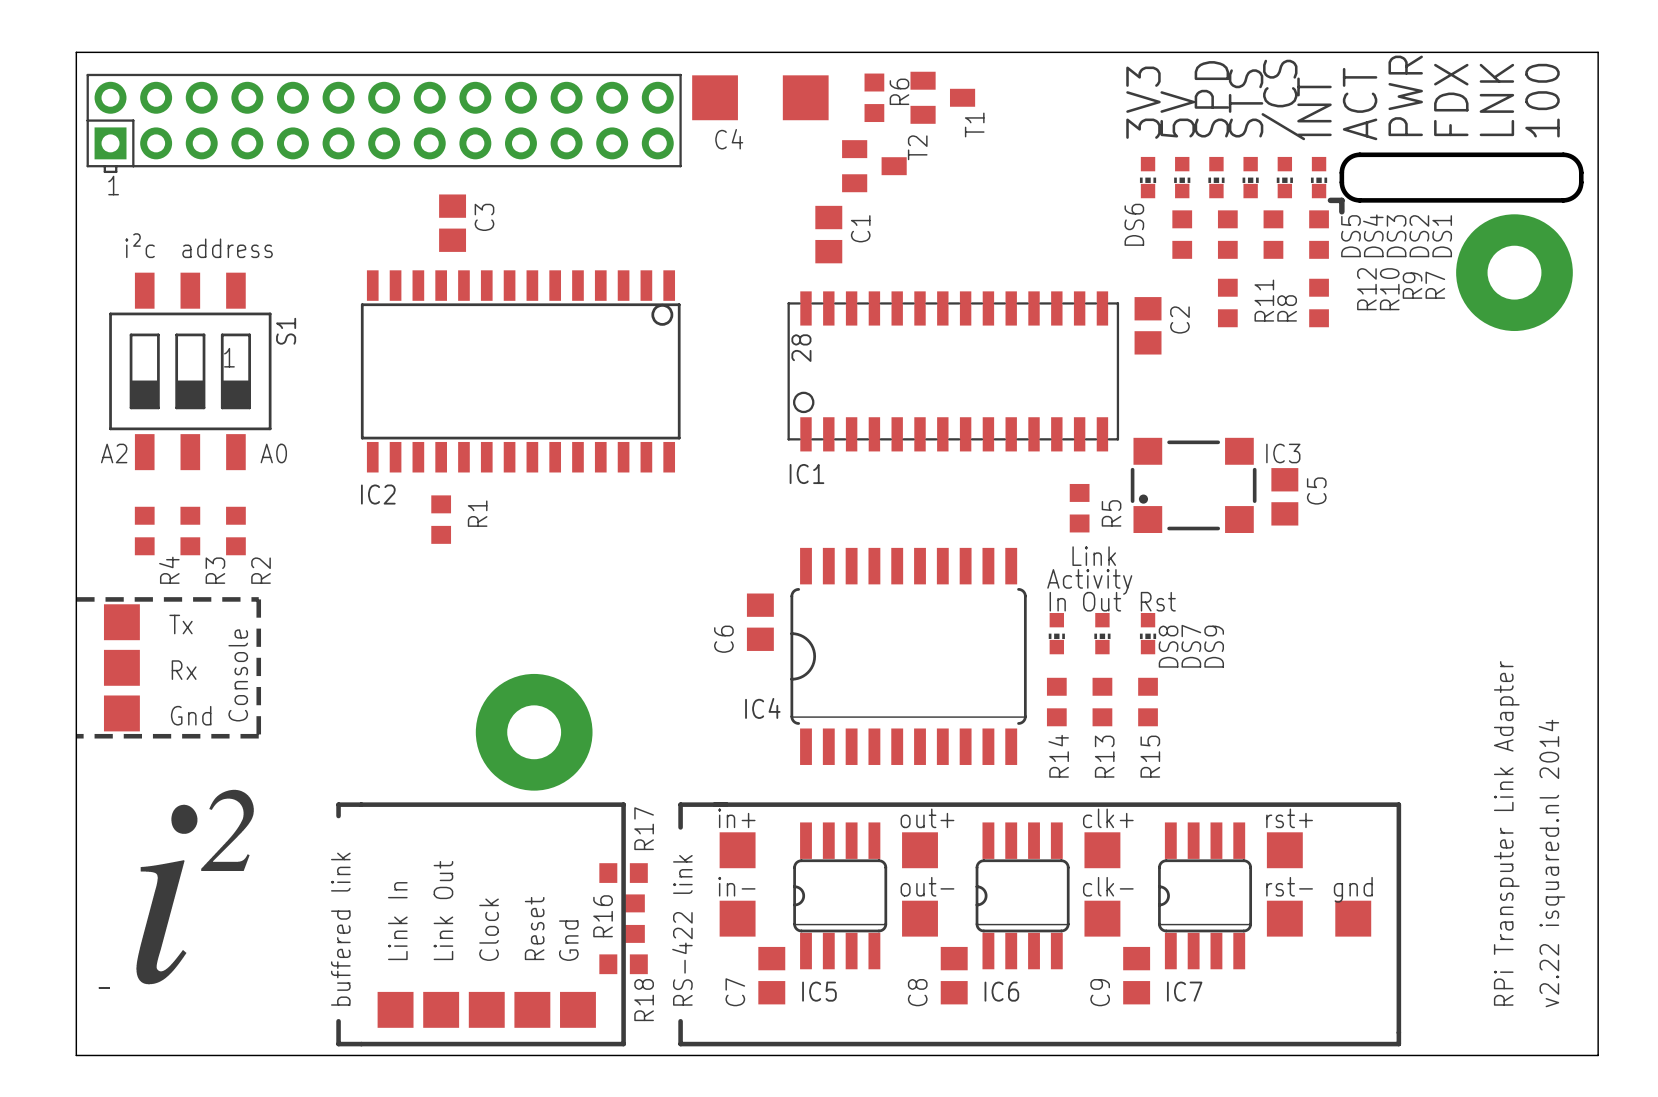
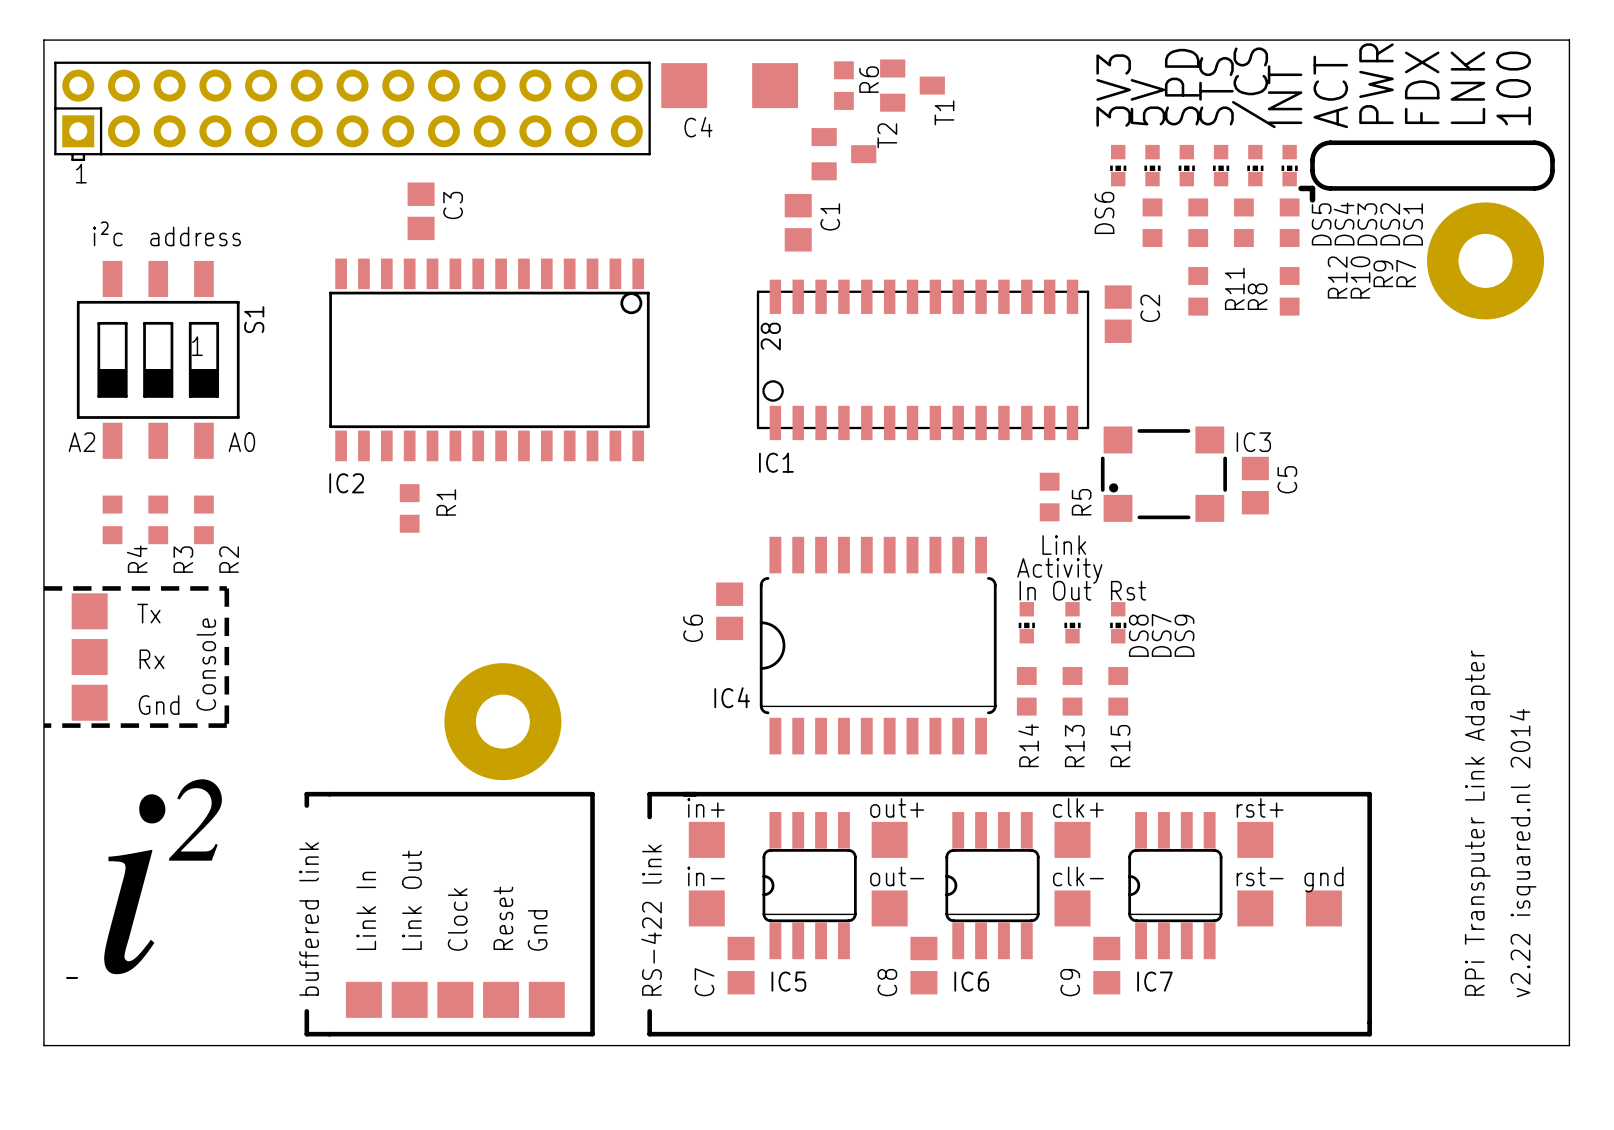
R17: (623, 873) -> none
R16: (634, 918) -> none
R18: (623, 964) -> none

